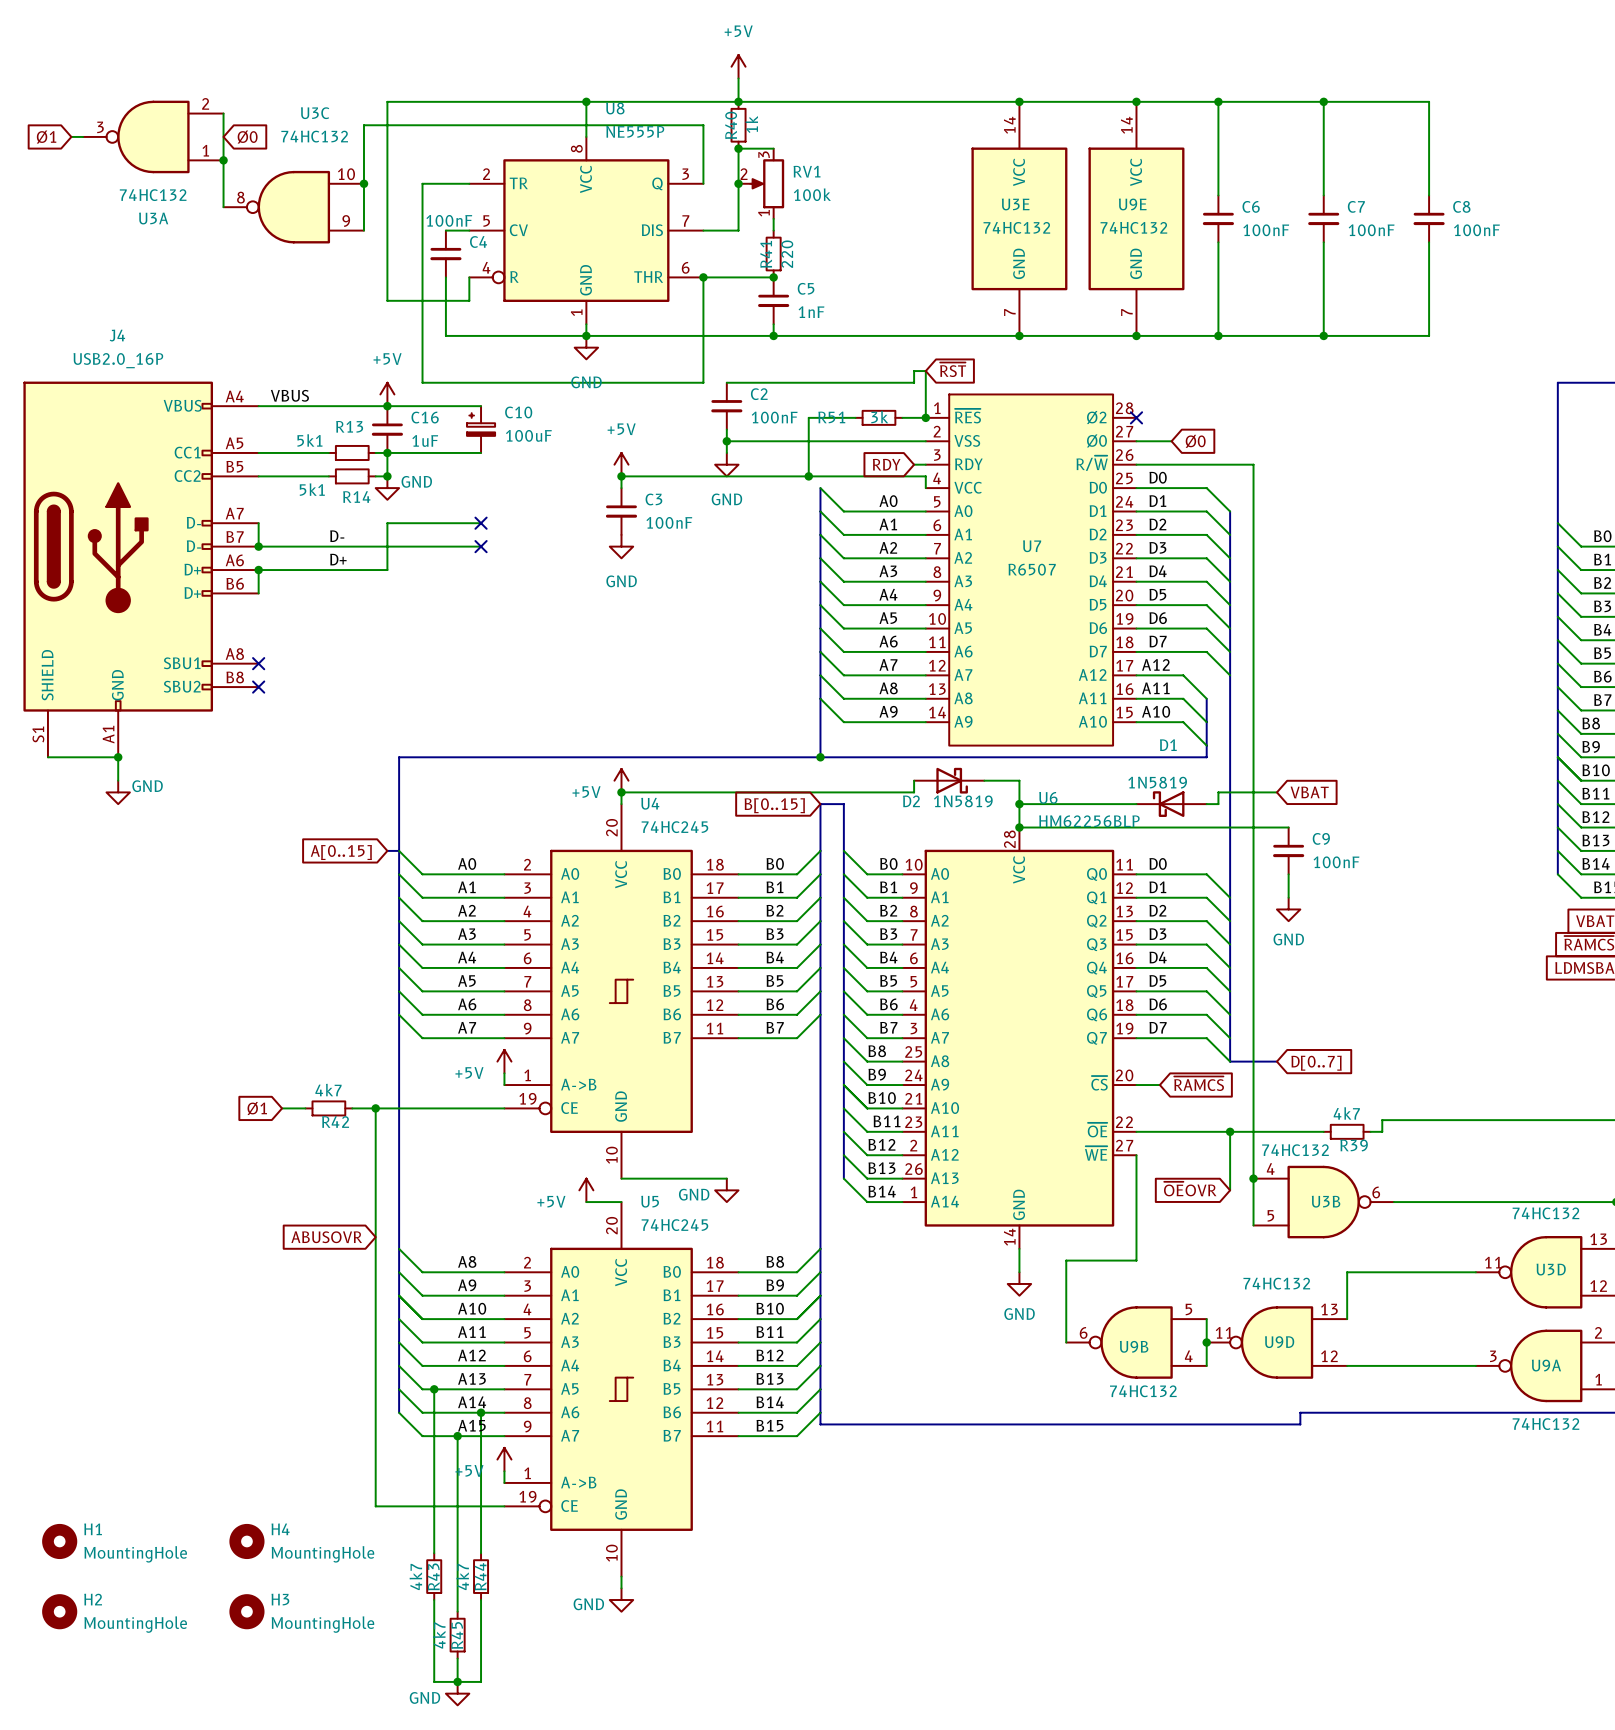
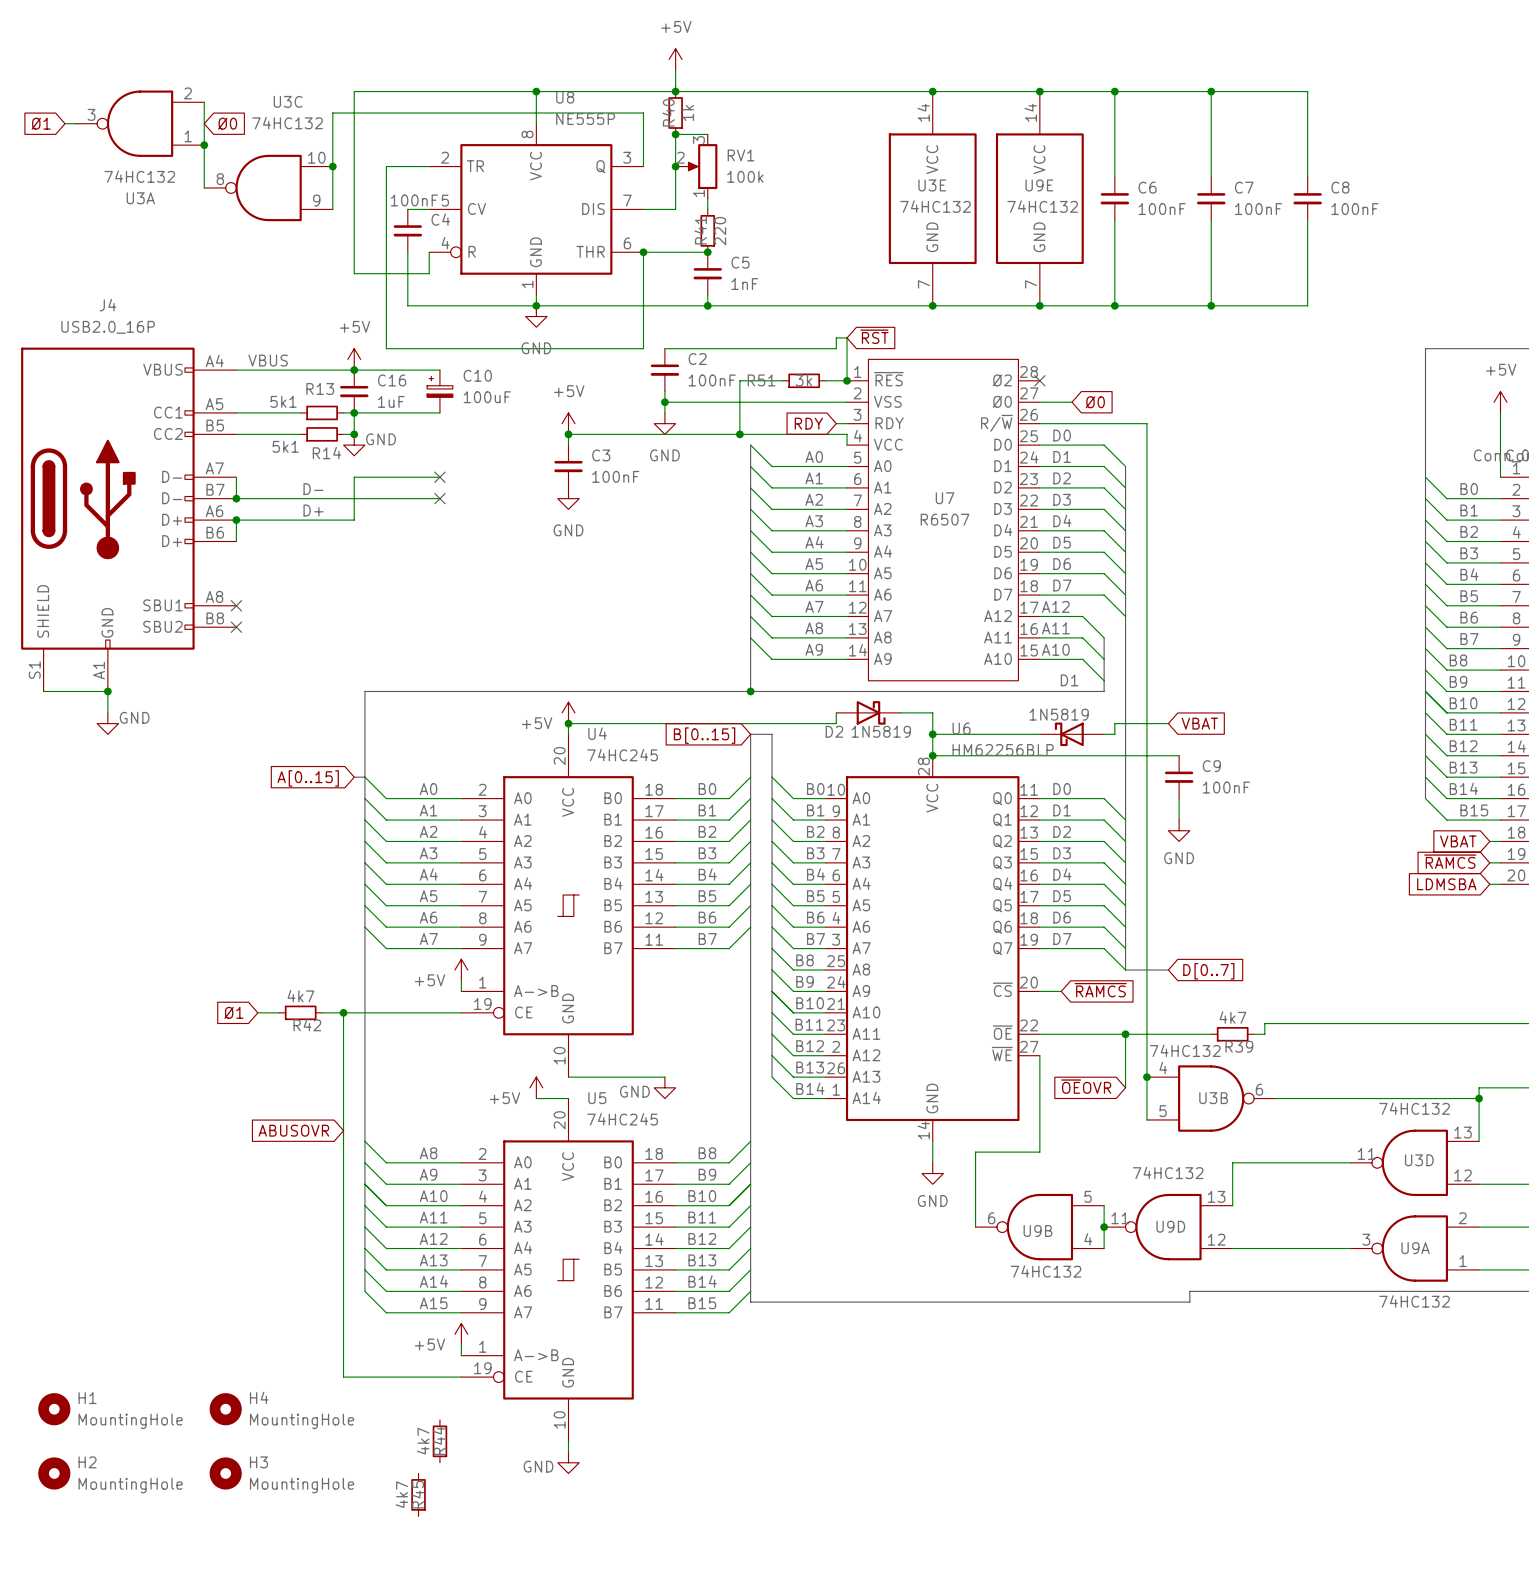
wire: (434, 1389) (434, 1553) -> none
junction: (434, 1389) -> none
wire: (481, 1412) (481, 1553) -> none
junction: (481, 1412) -> none
wire: (457, 1436) (457, 1611) -> none
junction: (457, 1436) -> none
R43: 4k7 (434, 1576) -> none
wire: (434, 1600) (434, 1681) (481, 1681) (481, 1600) -> none
wire: (457, 1658) (457, 1681) -> none
junction: (457, 1681) -> none
power symbol: GND (457, 1693) -> none

